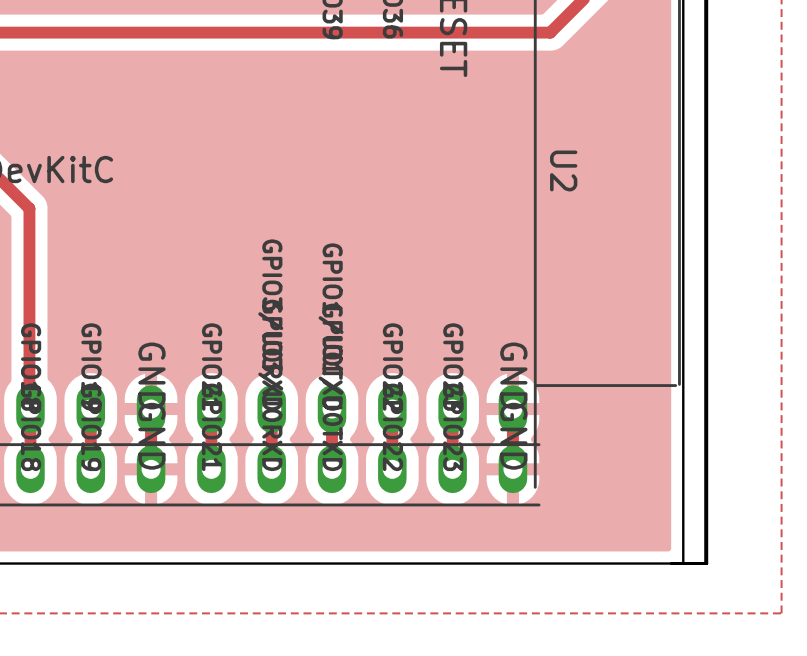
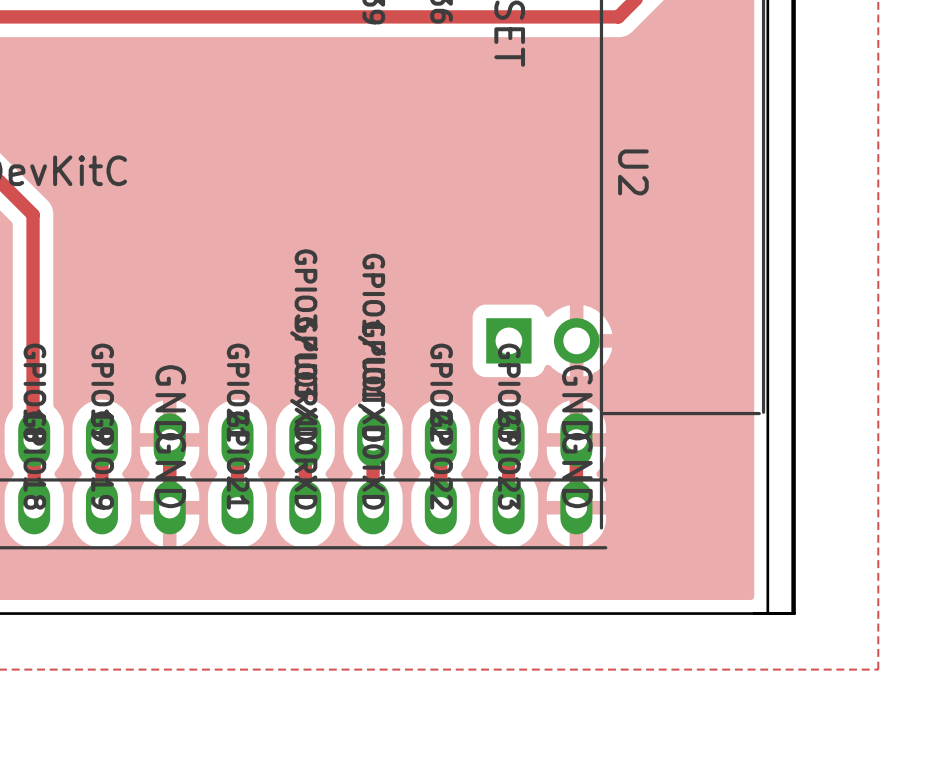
part: none -> (542, 340)

